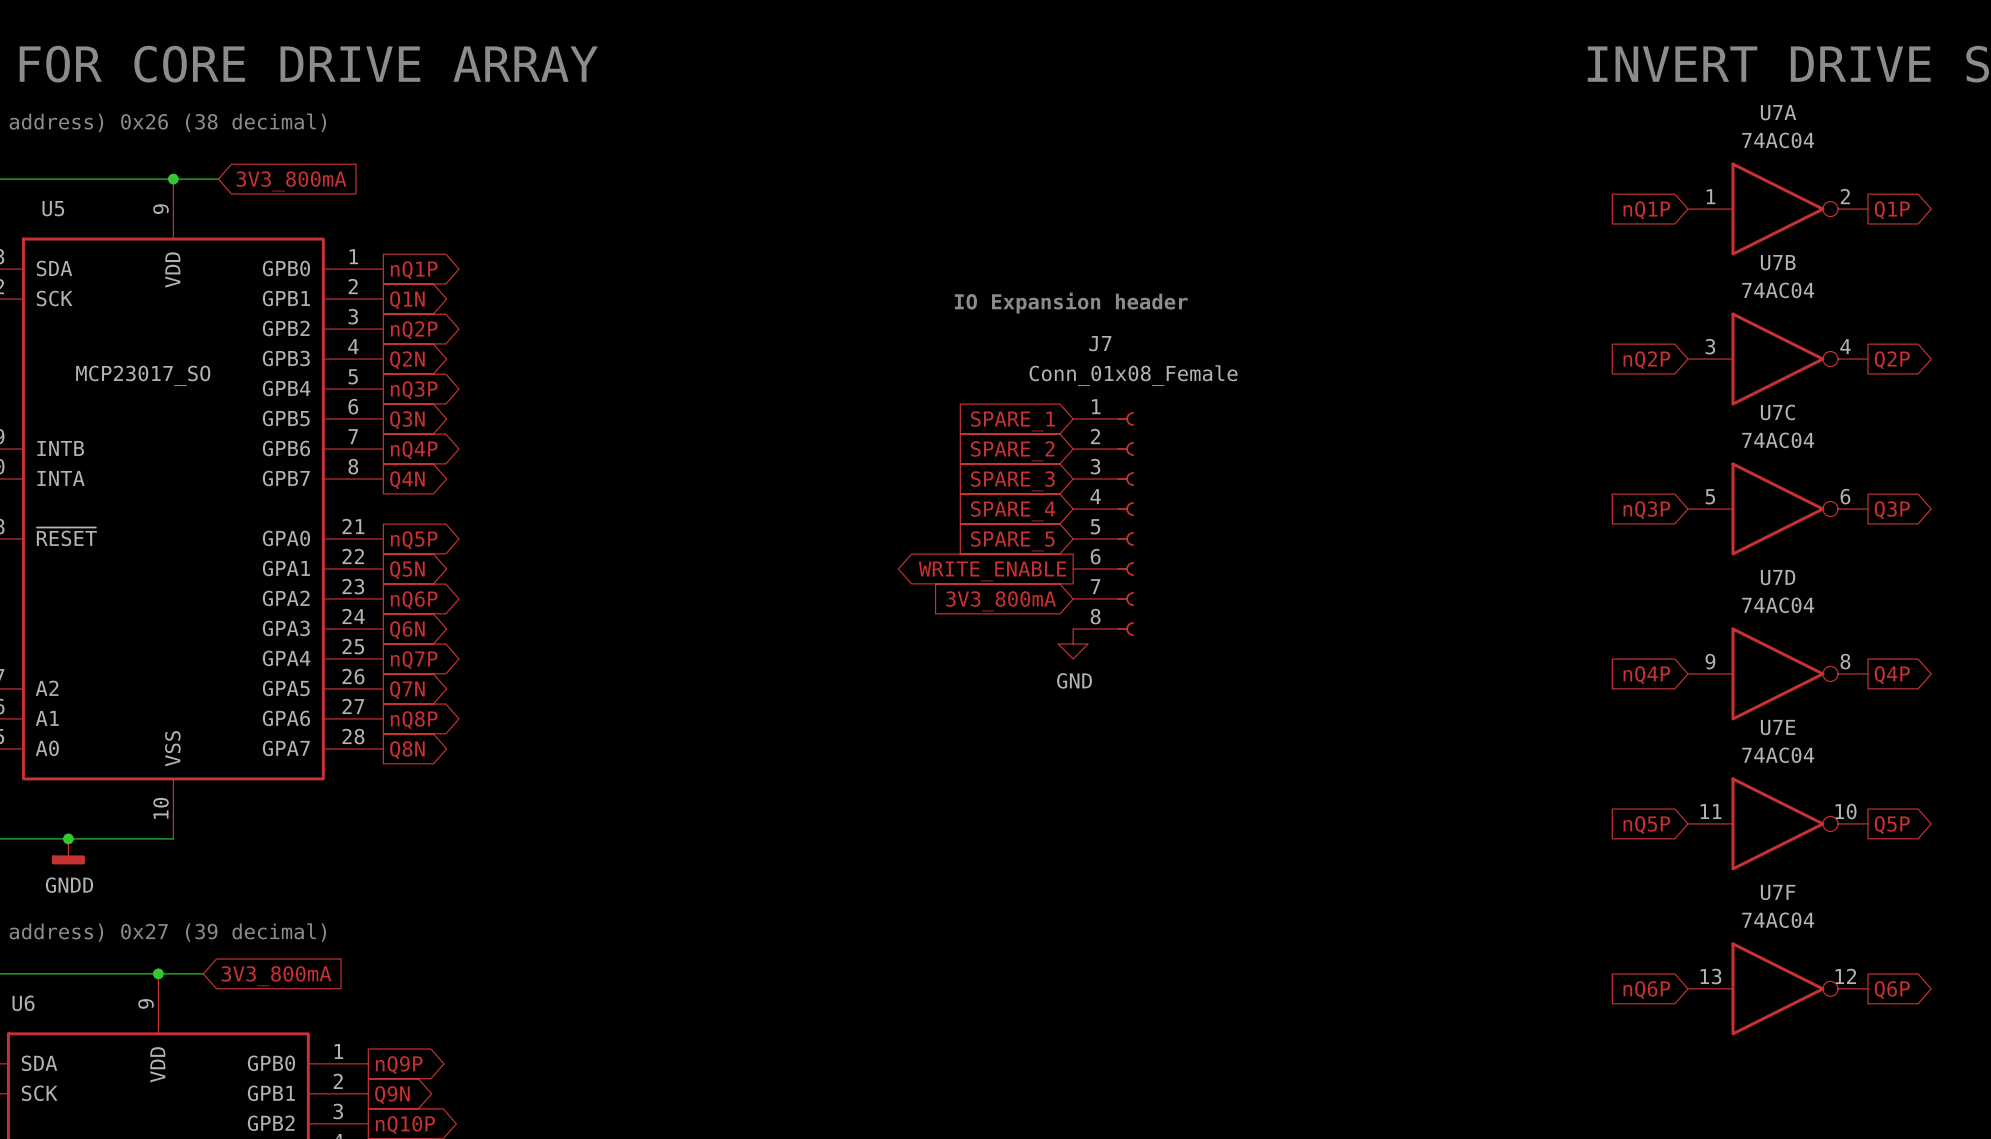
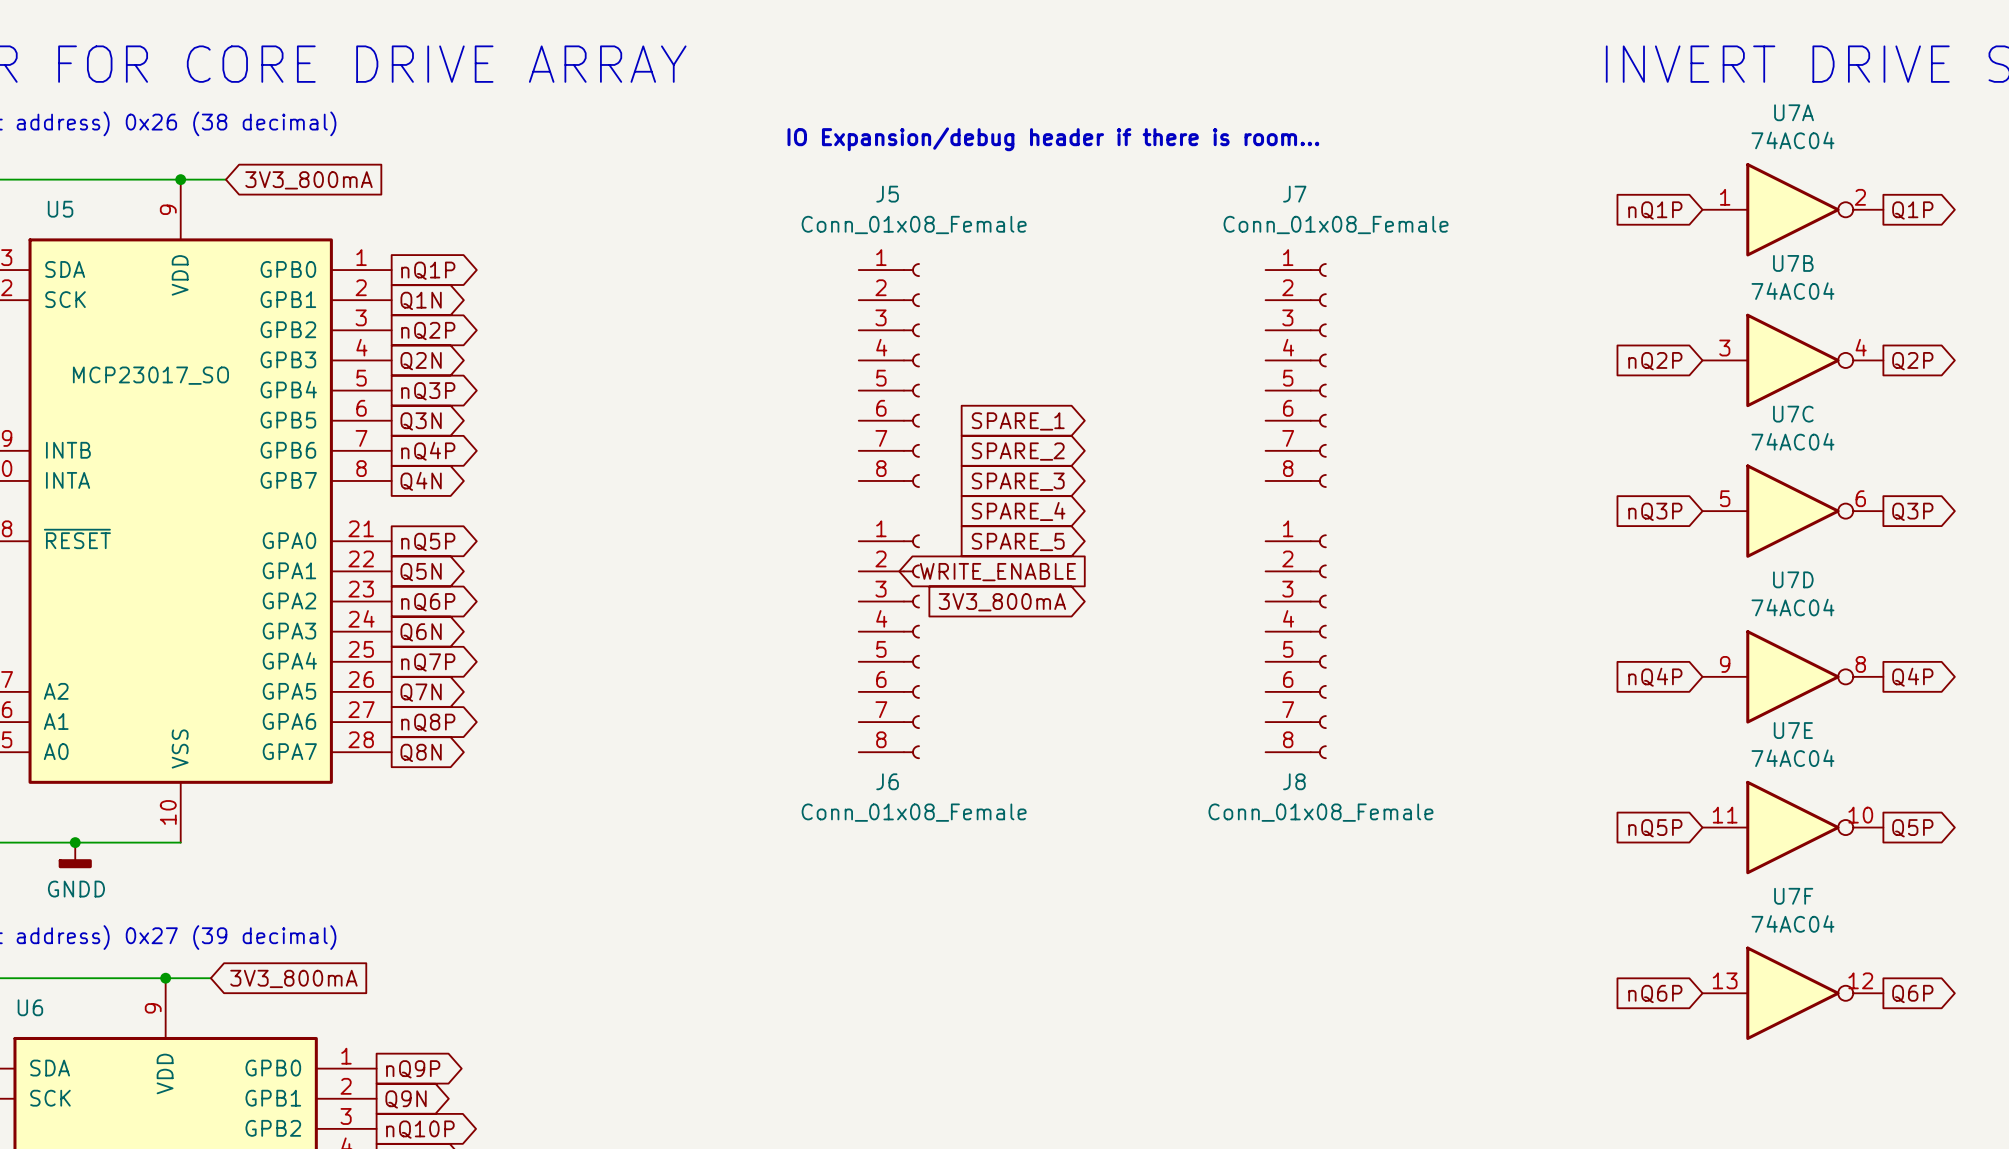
text: none -> IO Expansion/debug header if there is room… (1053, 139)
text: IO Expansion header (1071, 303) -> none
J5: none -> Conn_01x08_Female (889, 375)
J7 position: (1103, 523) -> (1296, 375)
J6: none -> Conn_01x08_Female (889, 646)
power symbol: GND (1073, 643) -> none
J8: none -> Conn_01x08_Female (1296, 646)

